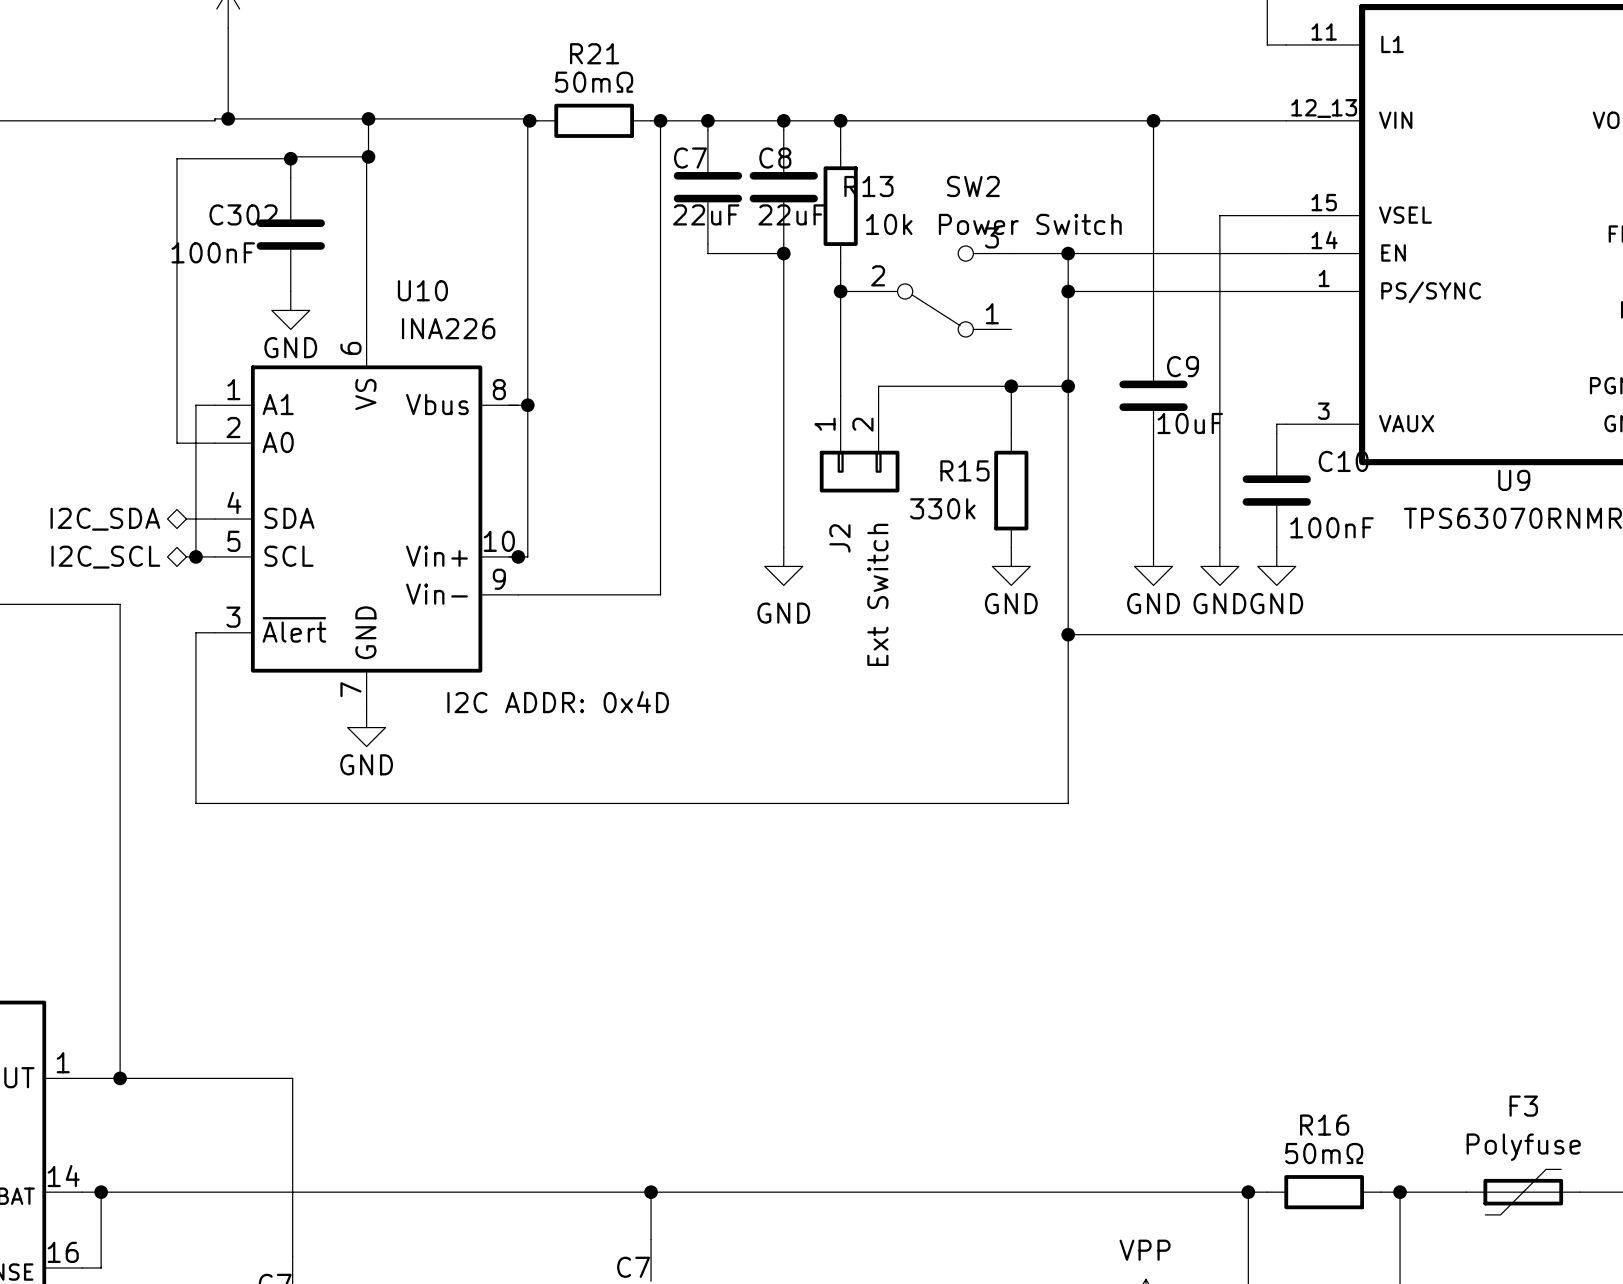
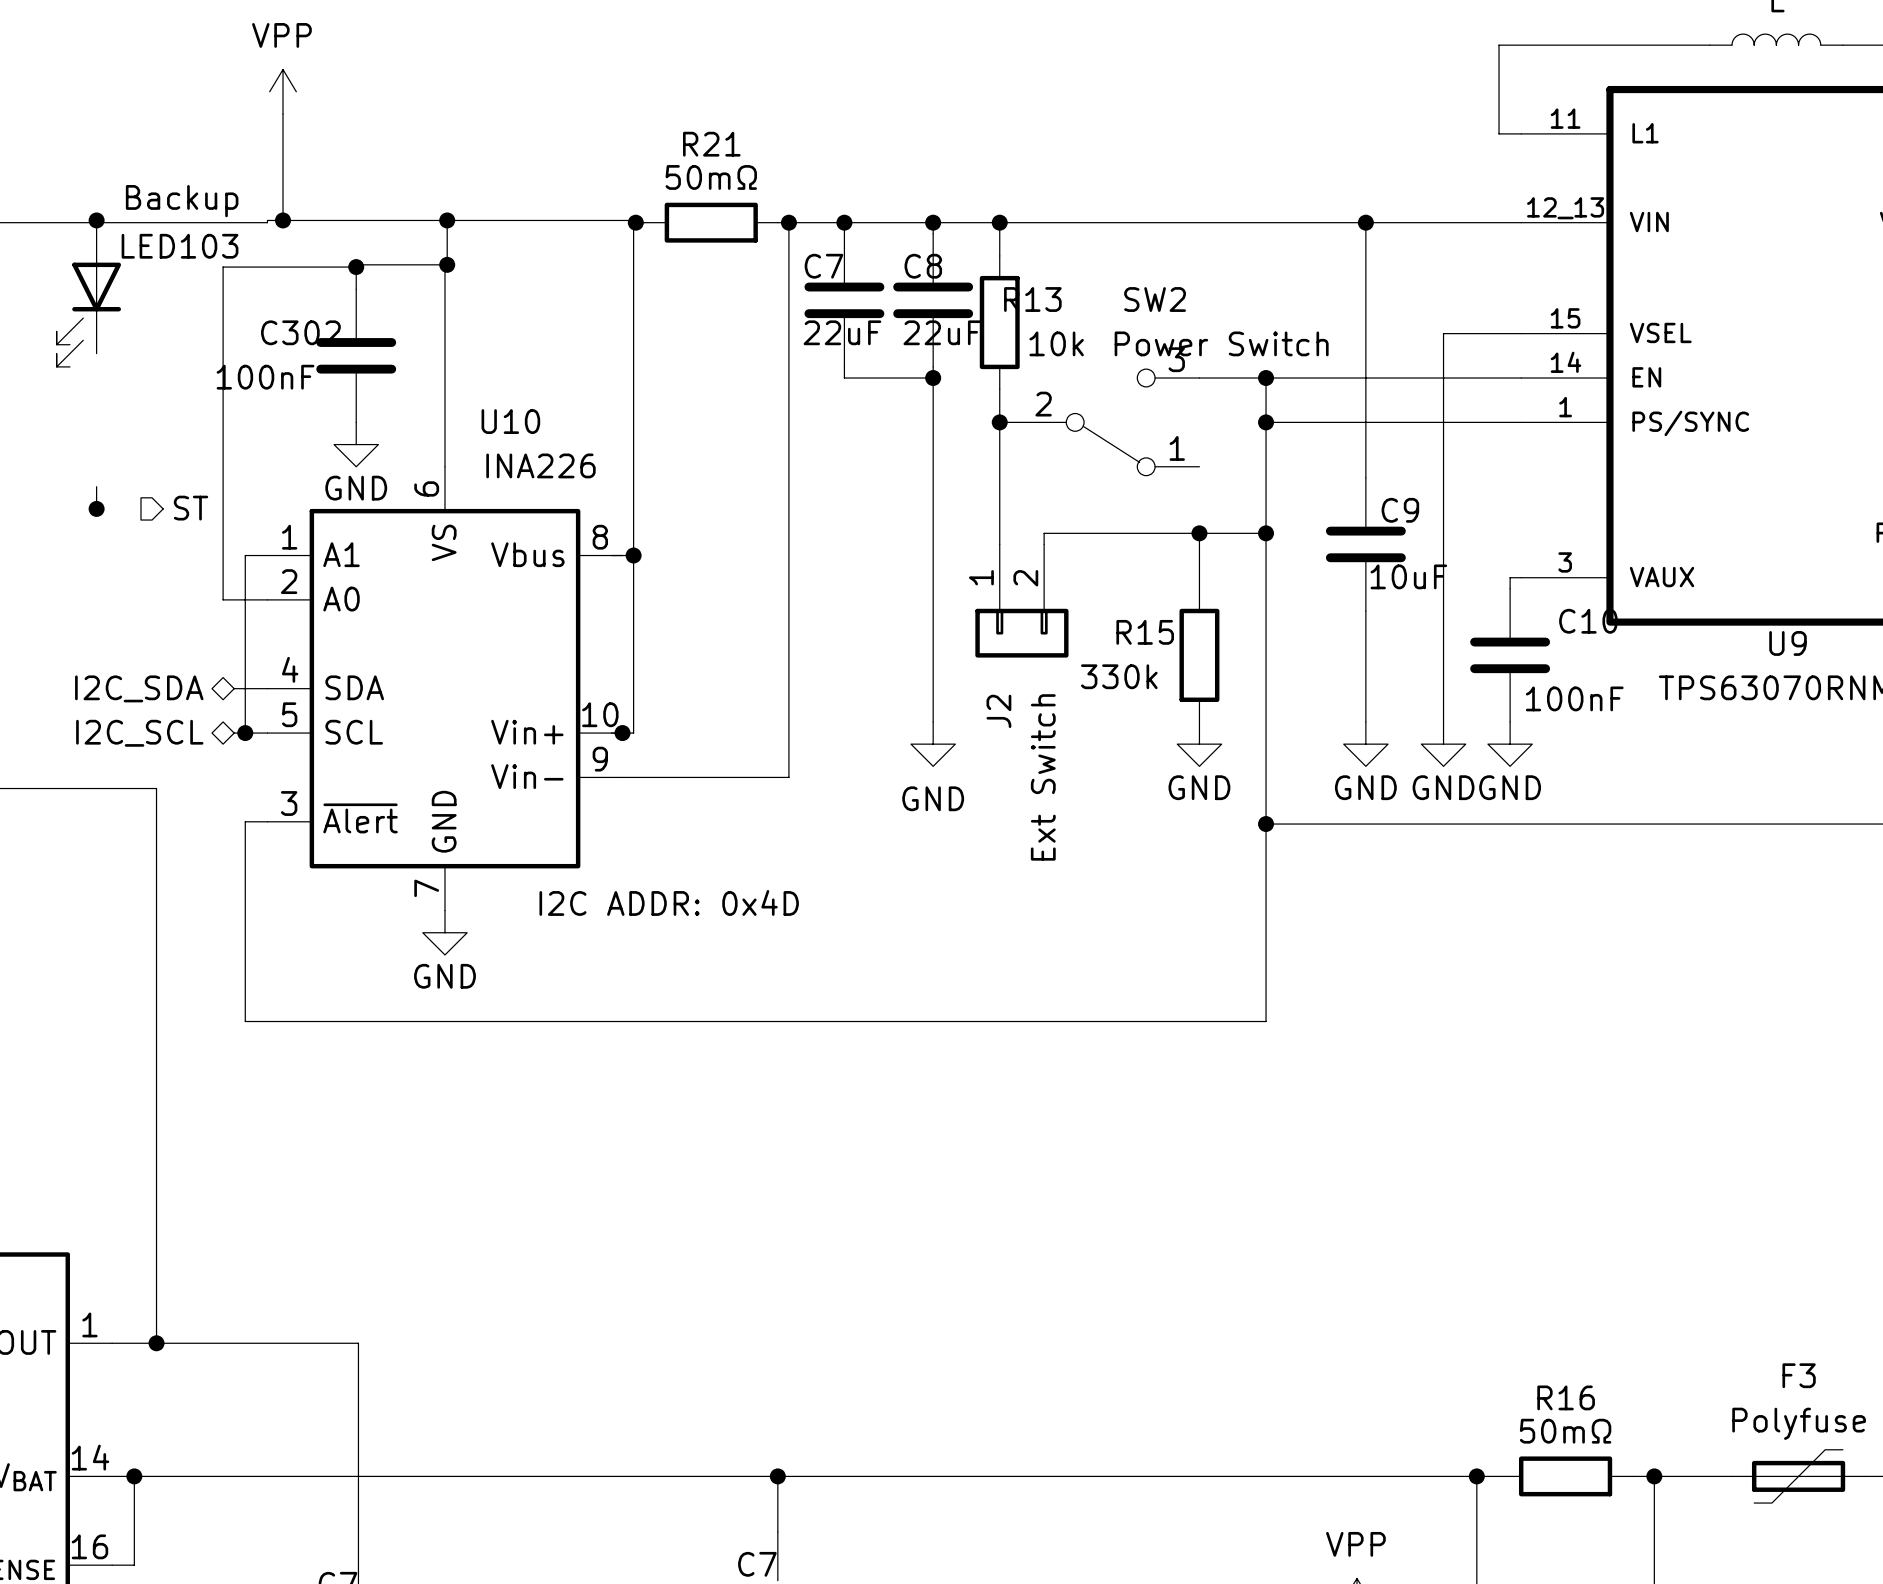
junction: none -> (96, 220)
LED103: none -> Backup (88, 293)
wire: none -> (96, 486) (96, 508)
hierarchical label: none -> ST (191, 508)
junction: none -> (96, 508)

